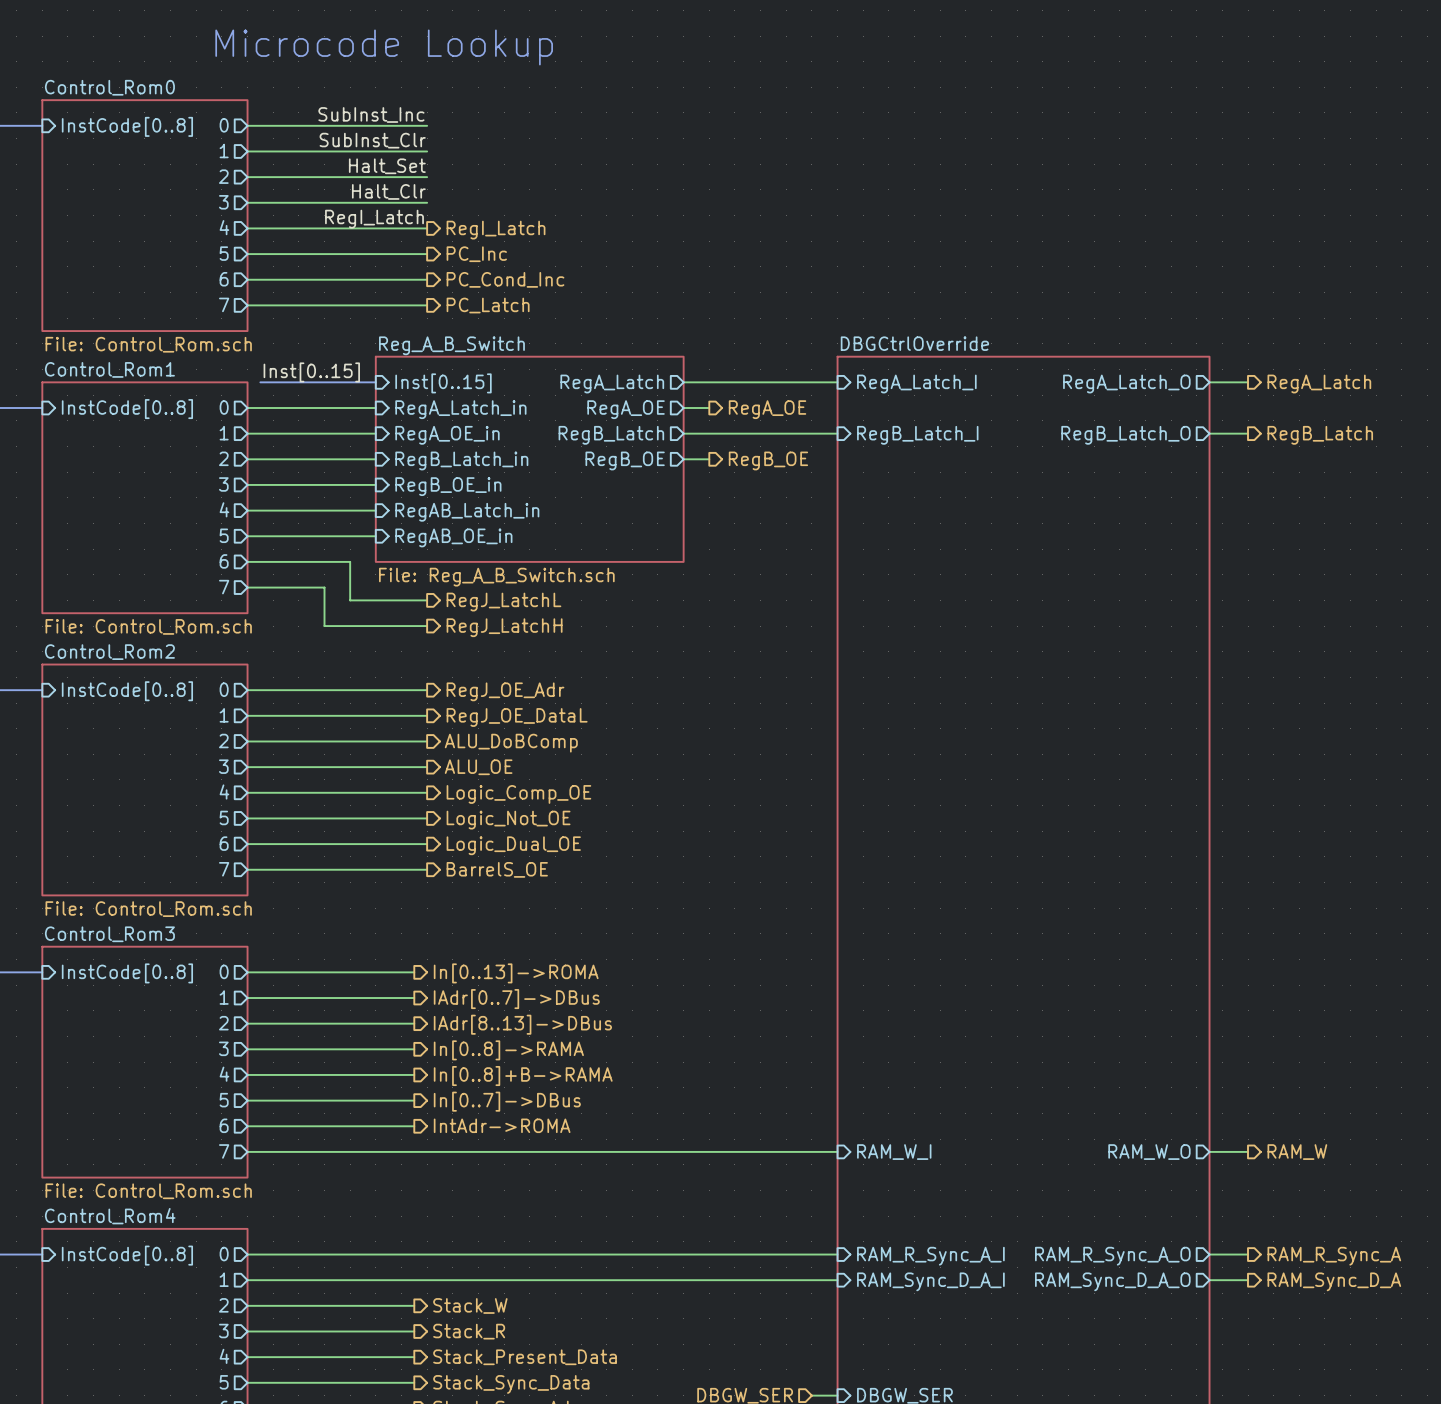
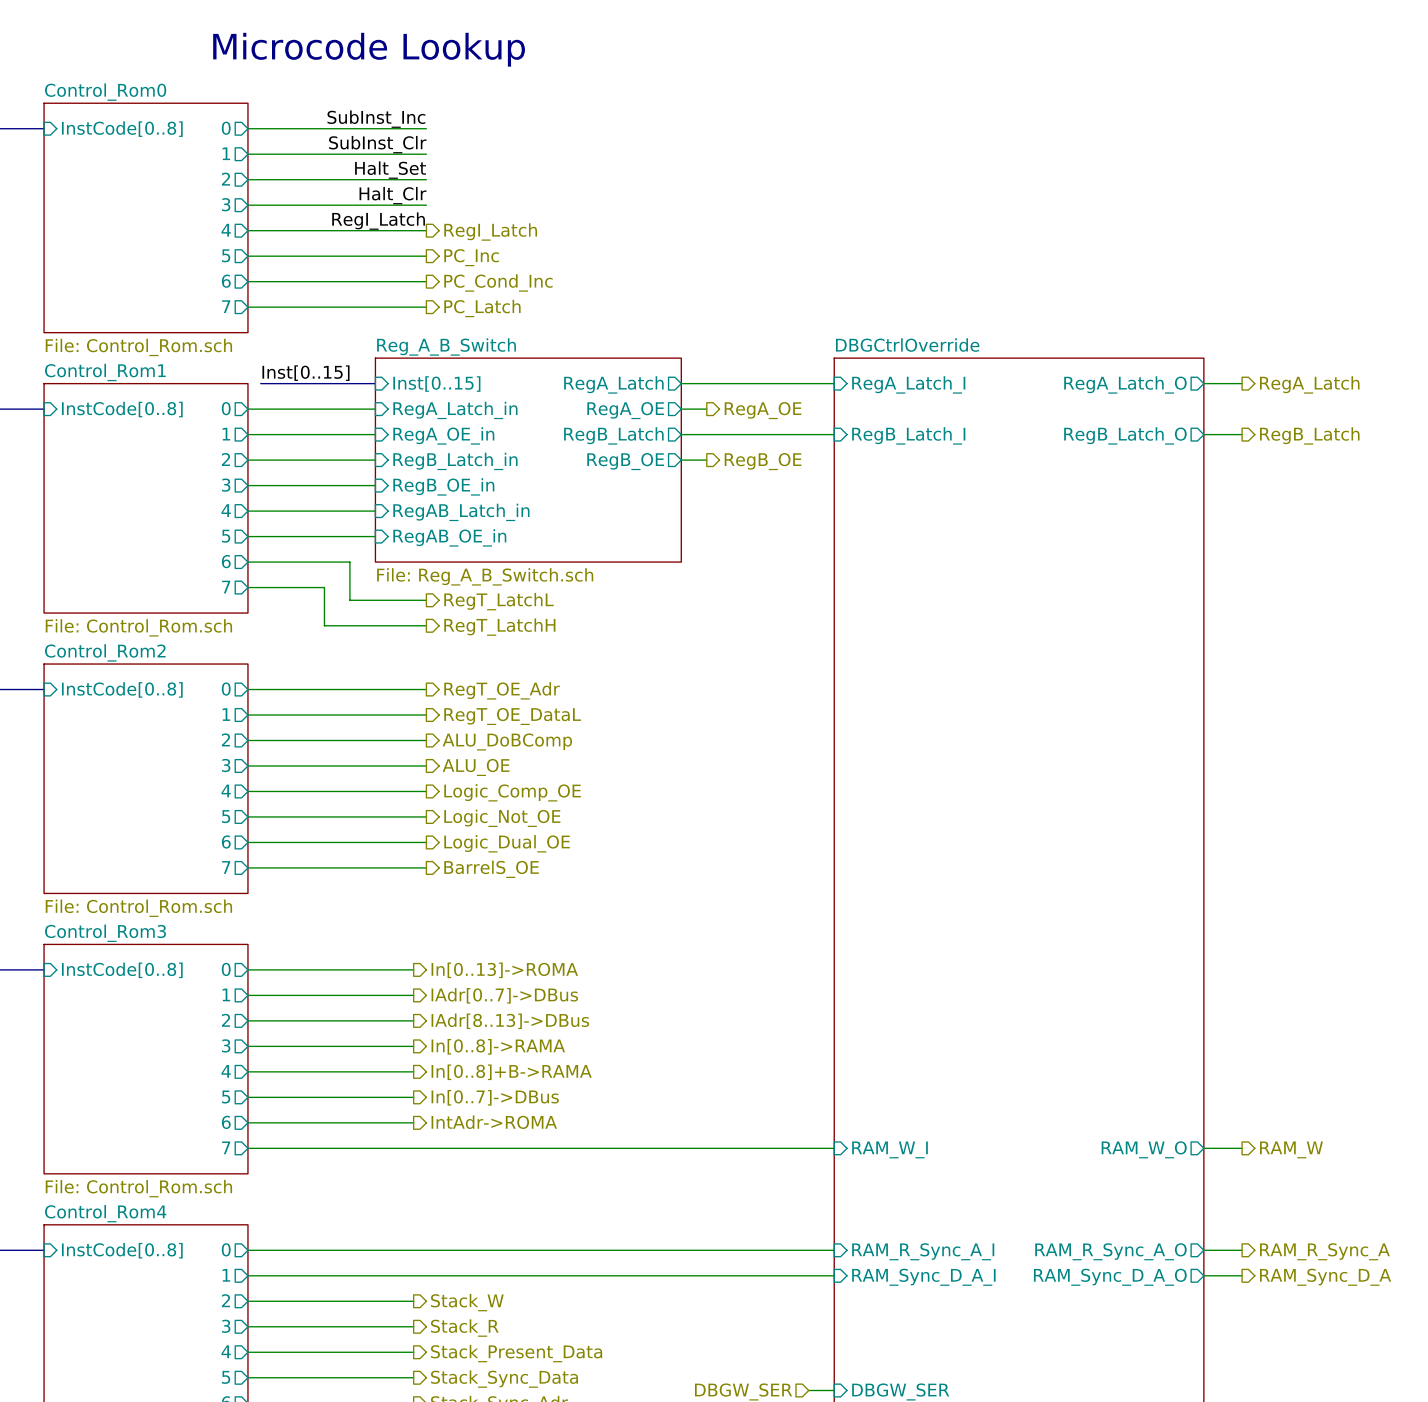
hierarchical label: RegJ_LatchL (503, 602) -> RegT_LatchL (498, 601)
hierarchical label: RegJ_LatchH (504, 627) -> RegT_LatchH (499, 627)
hierarchical label: RegJ_OE_Adr (505, 691) -> RegT_OE_Adr (502, 690)
hierarchical label: RegJ_OE_DataL (517, 717) -> RegT_OE_DataL (512, 716)

